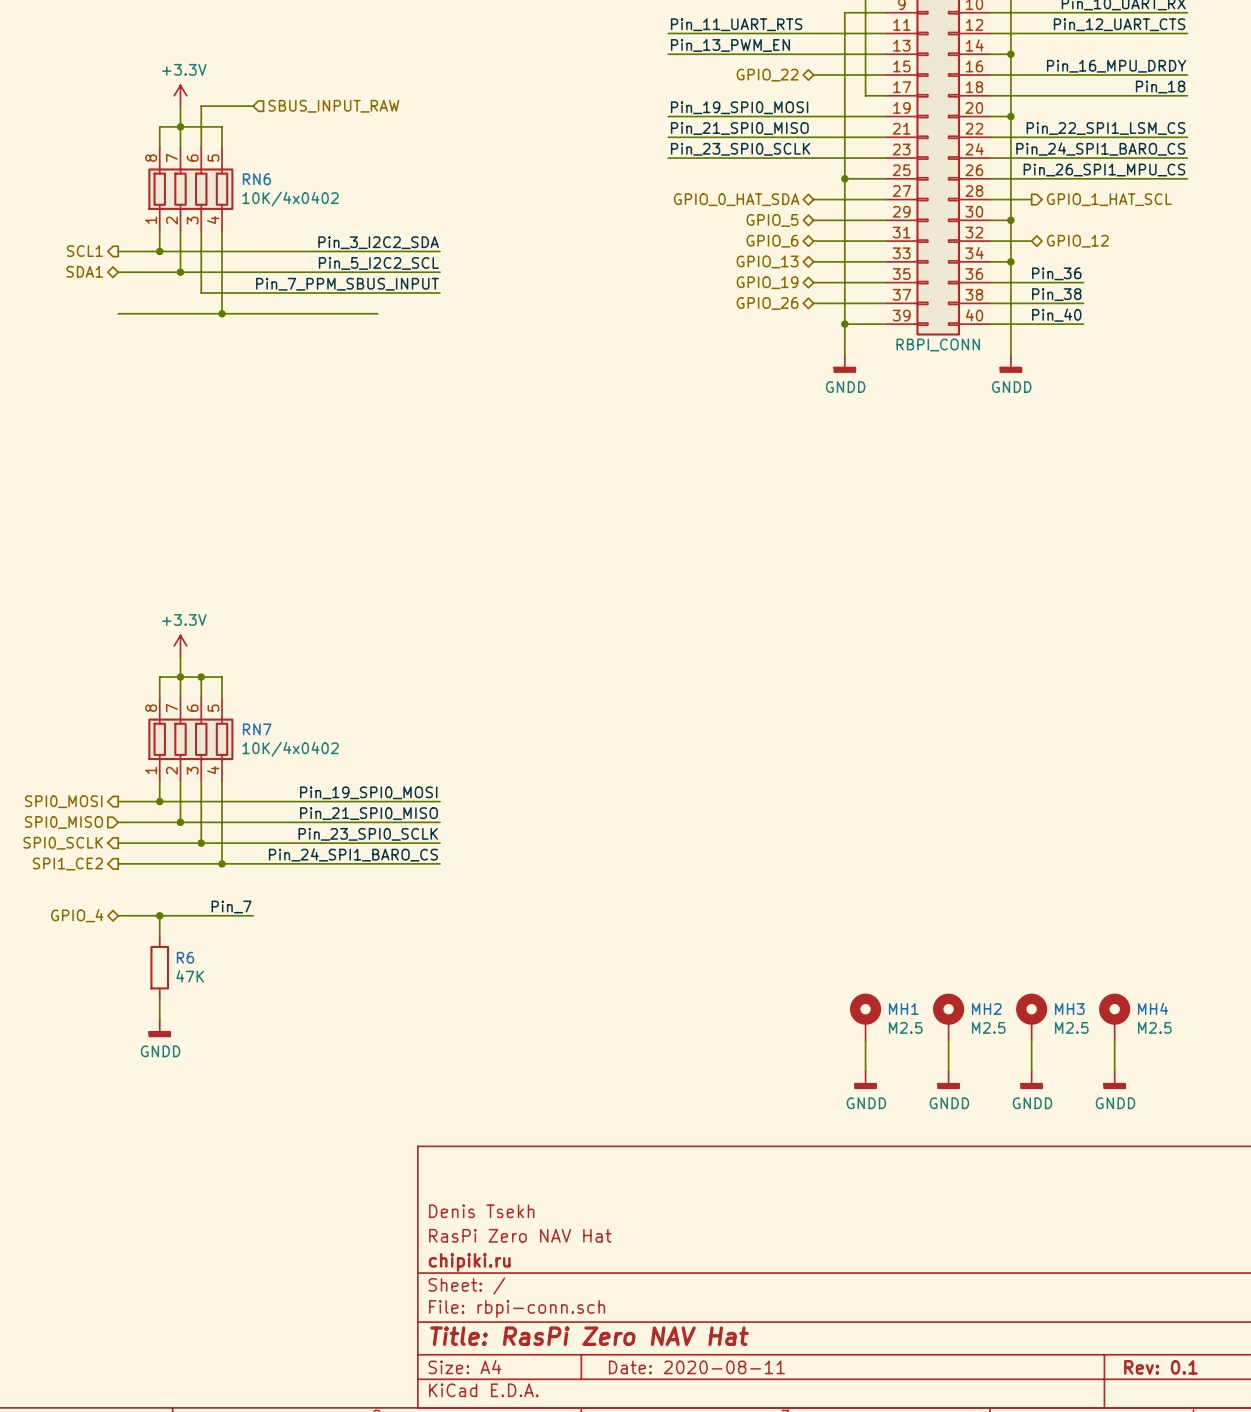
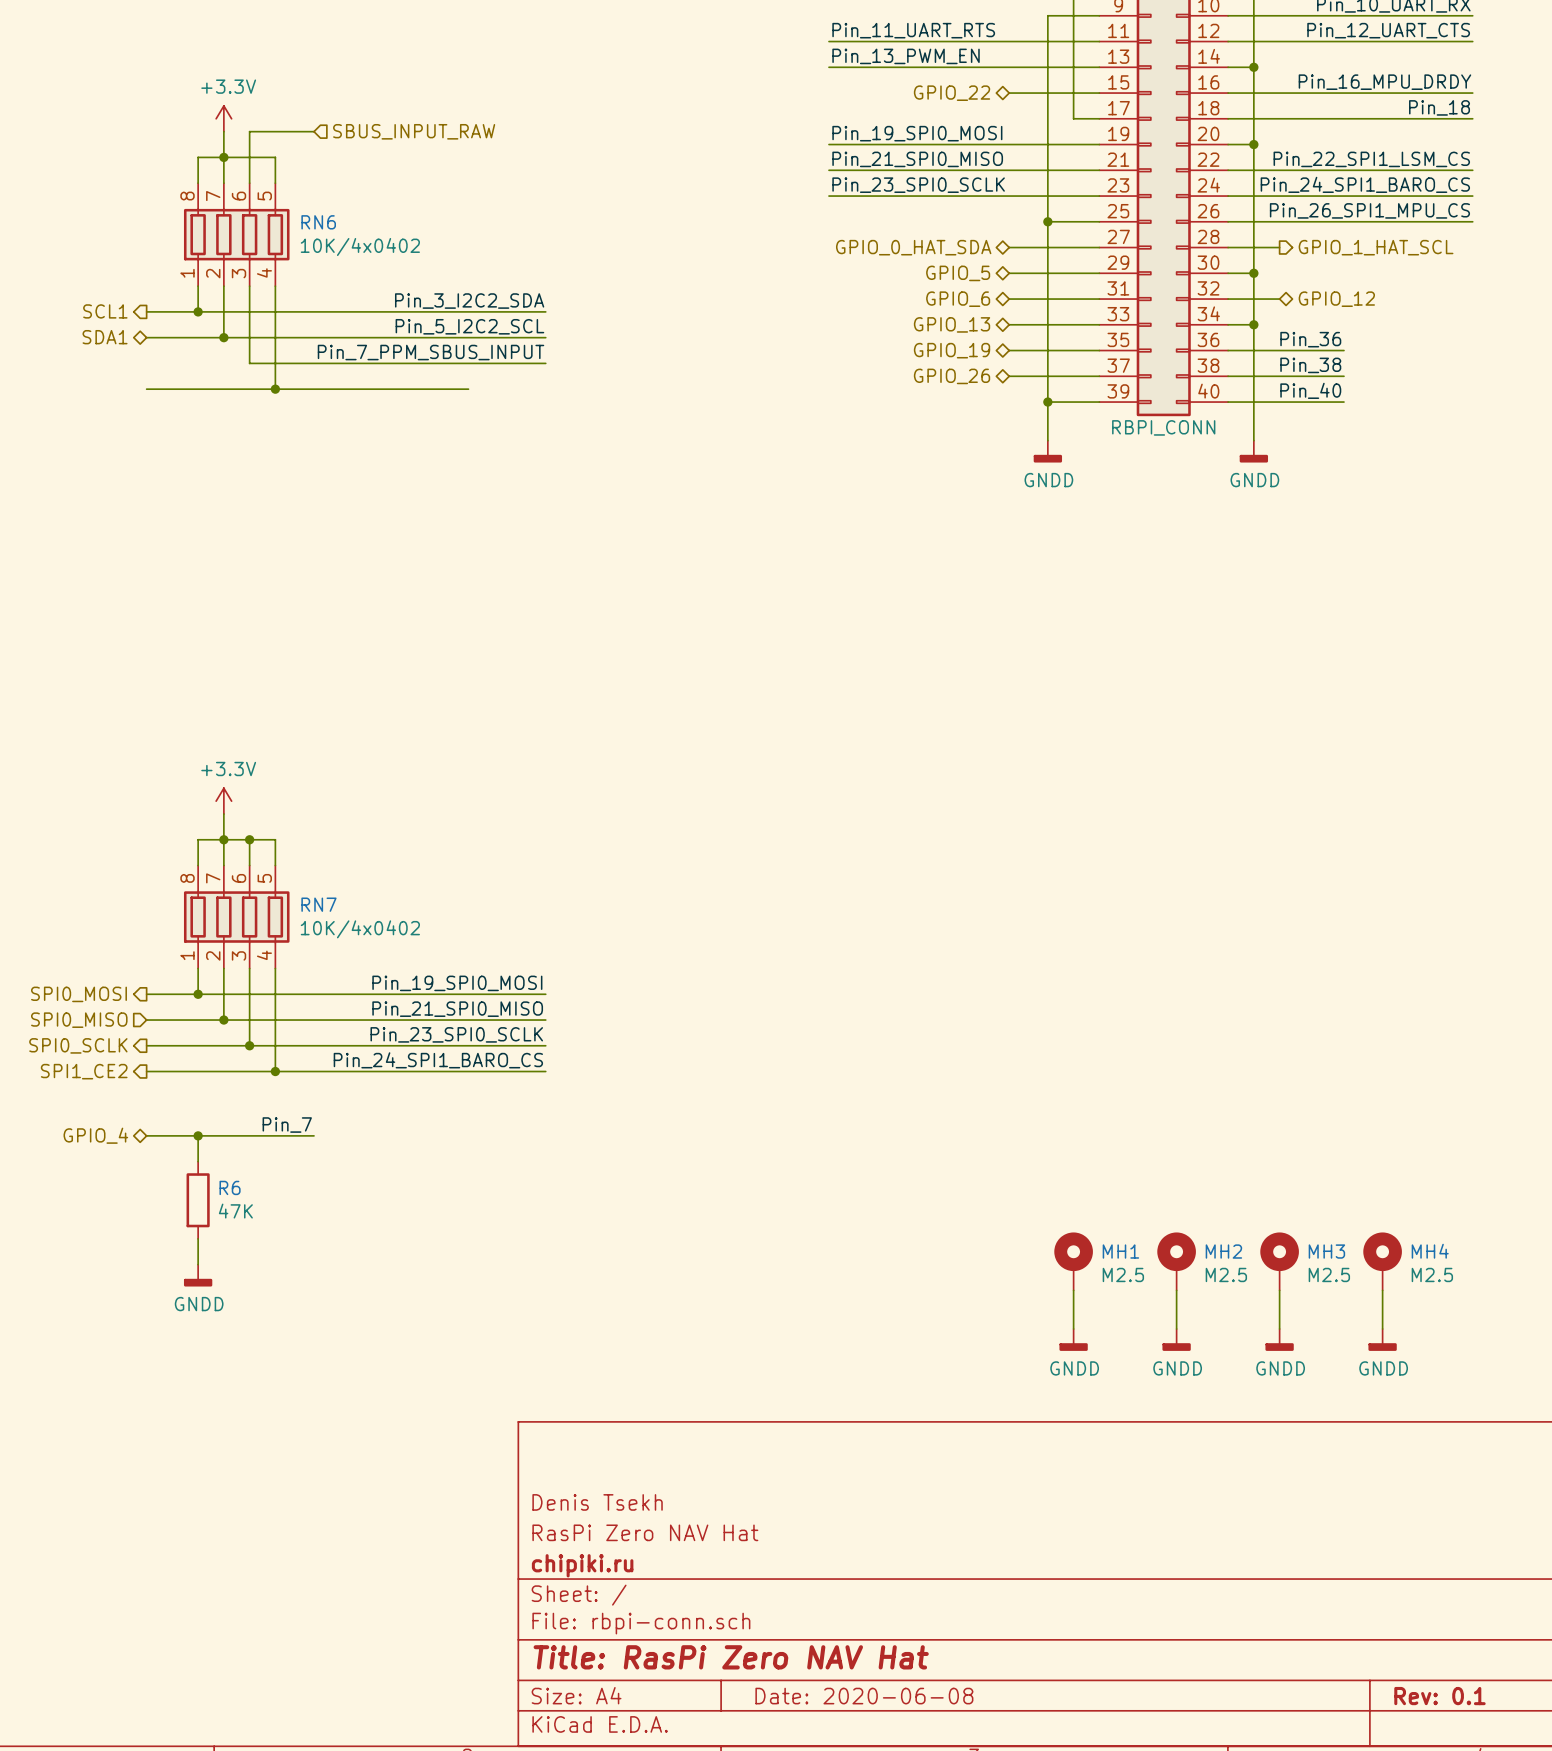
title block: Date: 2020-08-11 (696, 1367) -> Date: 2020-06-08 (864, 1696)

